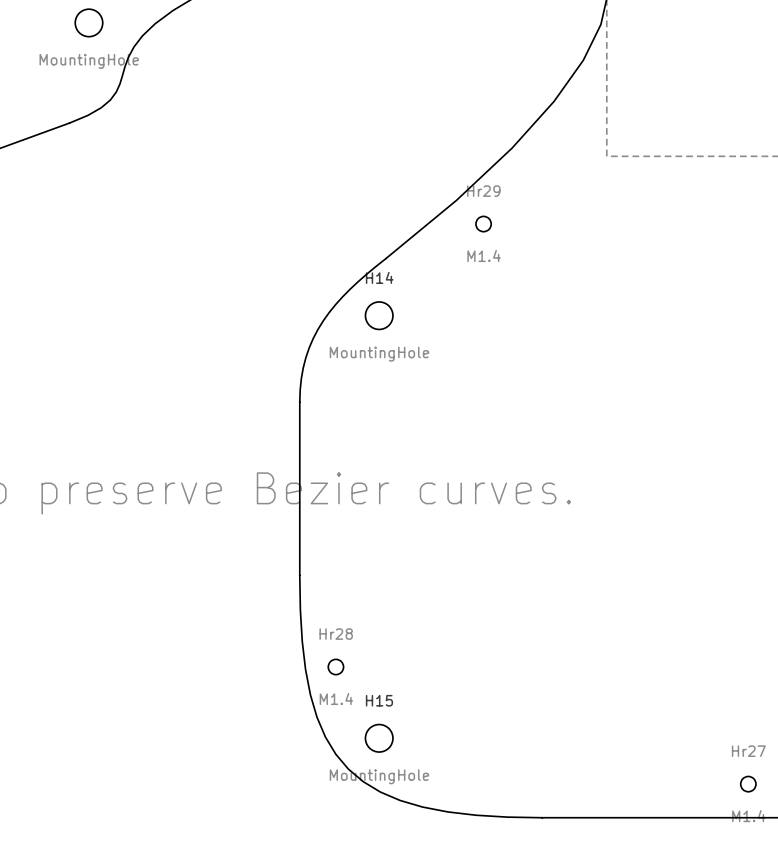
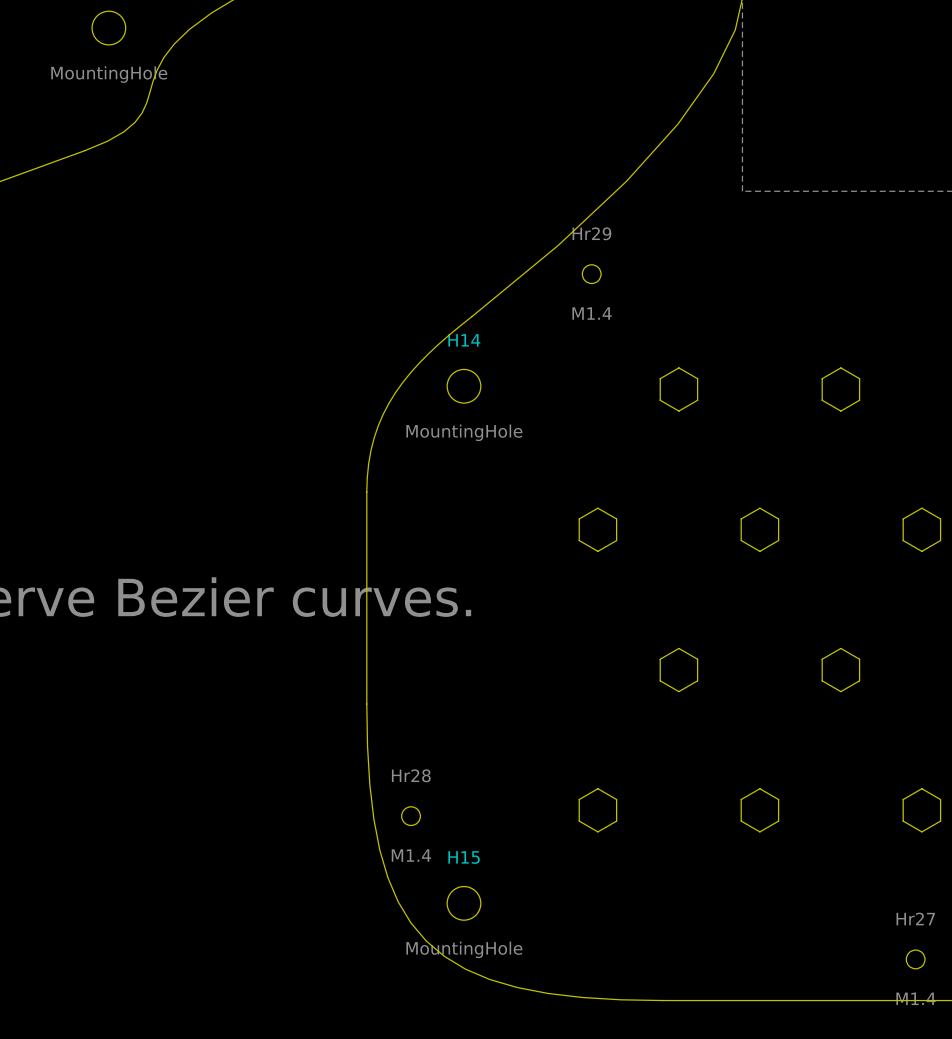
board edge: none -> (678, 367) (697, 378) (697, 400) (678, 411) (660, 400) (660, 378) (678, 367)
board edge: none -> (840, 367) (822, 378) (822, 400) (840, 411) (859, 400) (859, 378) (840, 367)
board edge: none -> (597, 508) (579, 518) (579, 540) (597, 551) (616, 540) (616, 518) (597, 508)
board edge: none -> (759, 508) (741, 518) (741, 540) (759, 551) (778, 540) (778, 518) (759, 508)
board edge: none -> (921, 508) (940, 518) (940, 540) (921, 551) (903, 540) (903, 518) (921, 508)
board edge: none -> (678, 648) (697, 659) (697, 680) (678, 691) (660, 680) (660, 659) (678, 648)
board edge: none -> (840, 648) (822, 659) (822, 680) (840, 691) (859, 680) (859, 659) (840, 648)
board edge: none -> (597, 788) (579, 799) (579, 821) (597, 831) (616, 821) (616, 799) (597, 788)
board edge: none -> (759, 788) (778, 799) (778, 821) (759, 831) (741, 821) (741, 799) (759, 788)
board edge: none -> (921, 788) (940, 799) (940, 821) (921, 831) (903, 821) (903, 799) (921, 788)

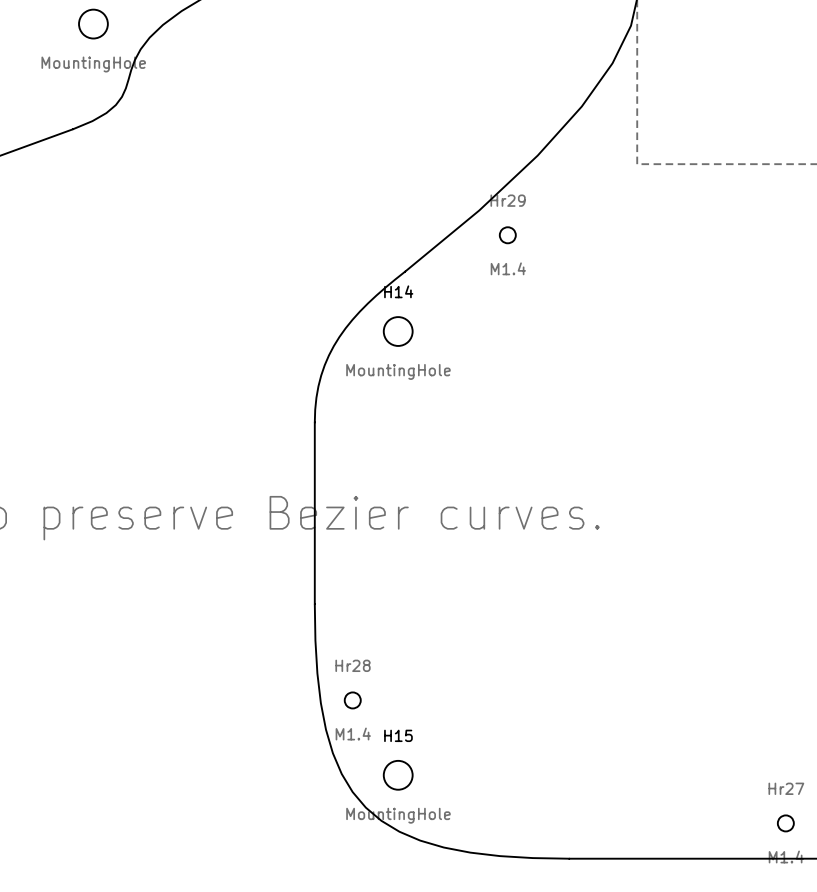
board edge: (678, 367) (697, 378) (697, 400) (678, 411) (660, 400) (660, 378) (678, 367) -> none
board edge: (840, 367) (822, 378) (822, 400) (840, 411) (859, 400) (859, 378) (840, 367) -> none
board edge: (597, 508) (579, 518) (579, 540) (597, 551) (616, 540) (616, 518) (597, 508) -> none
board edge: (759, 508) (741, 518) (741, 540) (759, 551) (778, 540) (778, 518) (759, 508) -> none
board edge: (921, 508) (940, 518) (940, 540) (921, 551) (903, 540) (903, 518) (921, 508) -> none
board edge: (678, 648) (697, 659) (697, 680) (678, 691) (660, 680) (660, 659) (678, 648) -> none
board edge: (840, 648) (822, 659) (822, 680) (840, 691) (859, 680) (859, 659) (840, 648) -> none
board edge: (597, 788) (579, 799) (579, 821) (597, 831) (616, 821) (616, 799) (597, 788) -> none
board edge: (759, 788) (778, 799) (778, 821) (759, 831) (741, 821) (741, 799) (759, 788) -> none
board edge: (921, 788) (940, 799) (940, 821) (921, 831) (903, 821) (903, 799) (921, 788) -> none

